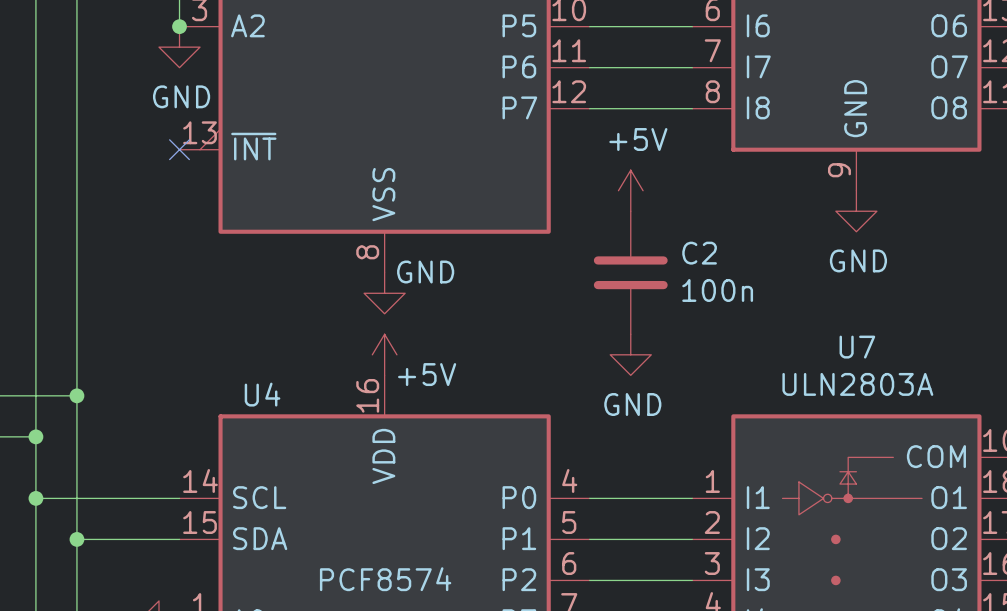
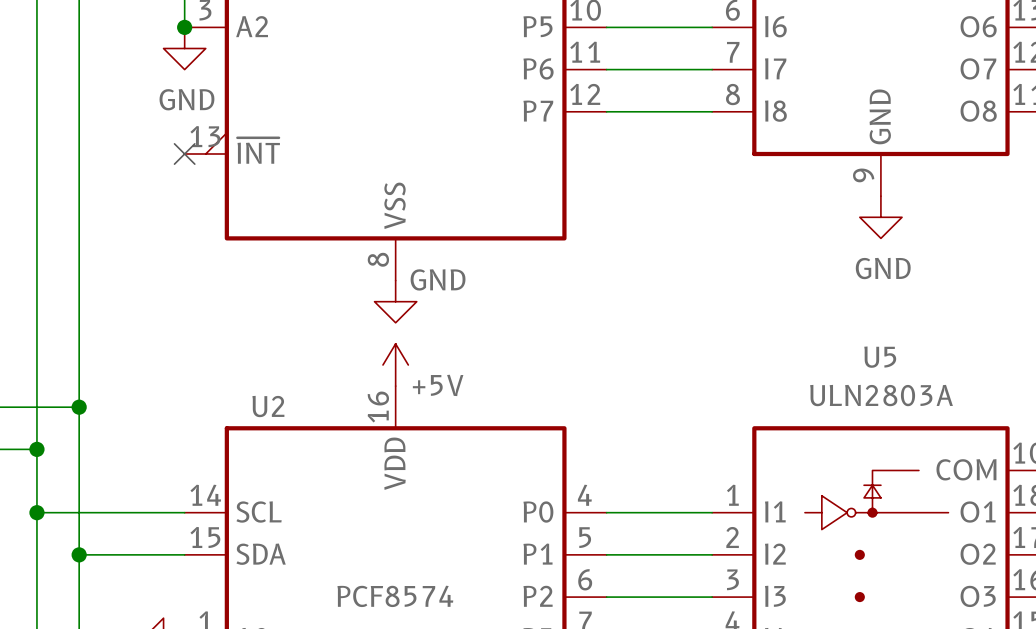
power symbol: +5V (630, 190) -> none
C2: 100n (630, 272) -> none
U7 name: U7 (857, 347) -> U5 (880, 357)
power symbol: GND (630, 354) -> none
U4 name: U4 (262, 394) -> U2 (268, 406)

